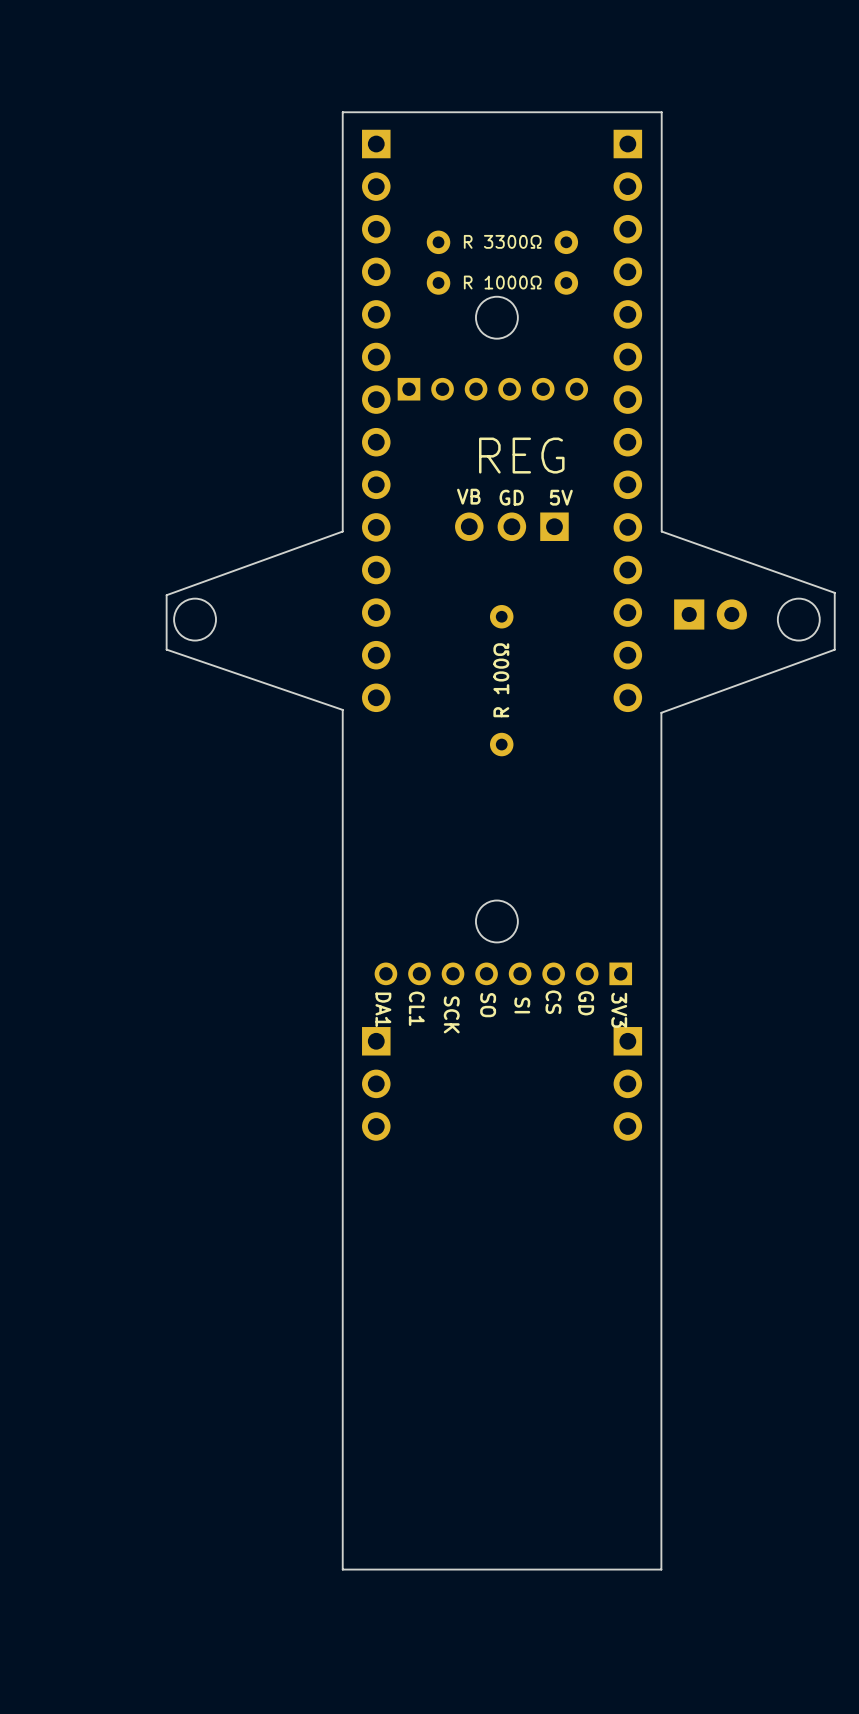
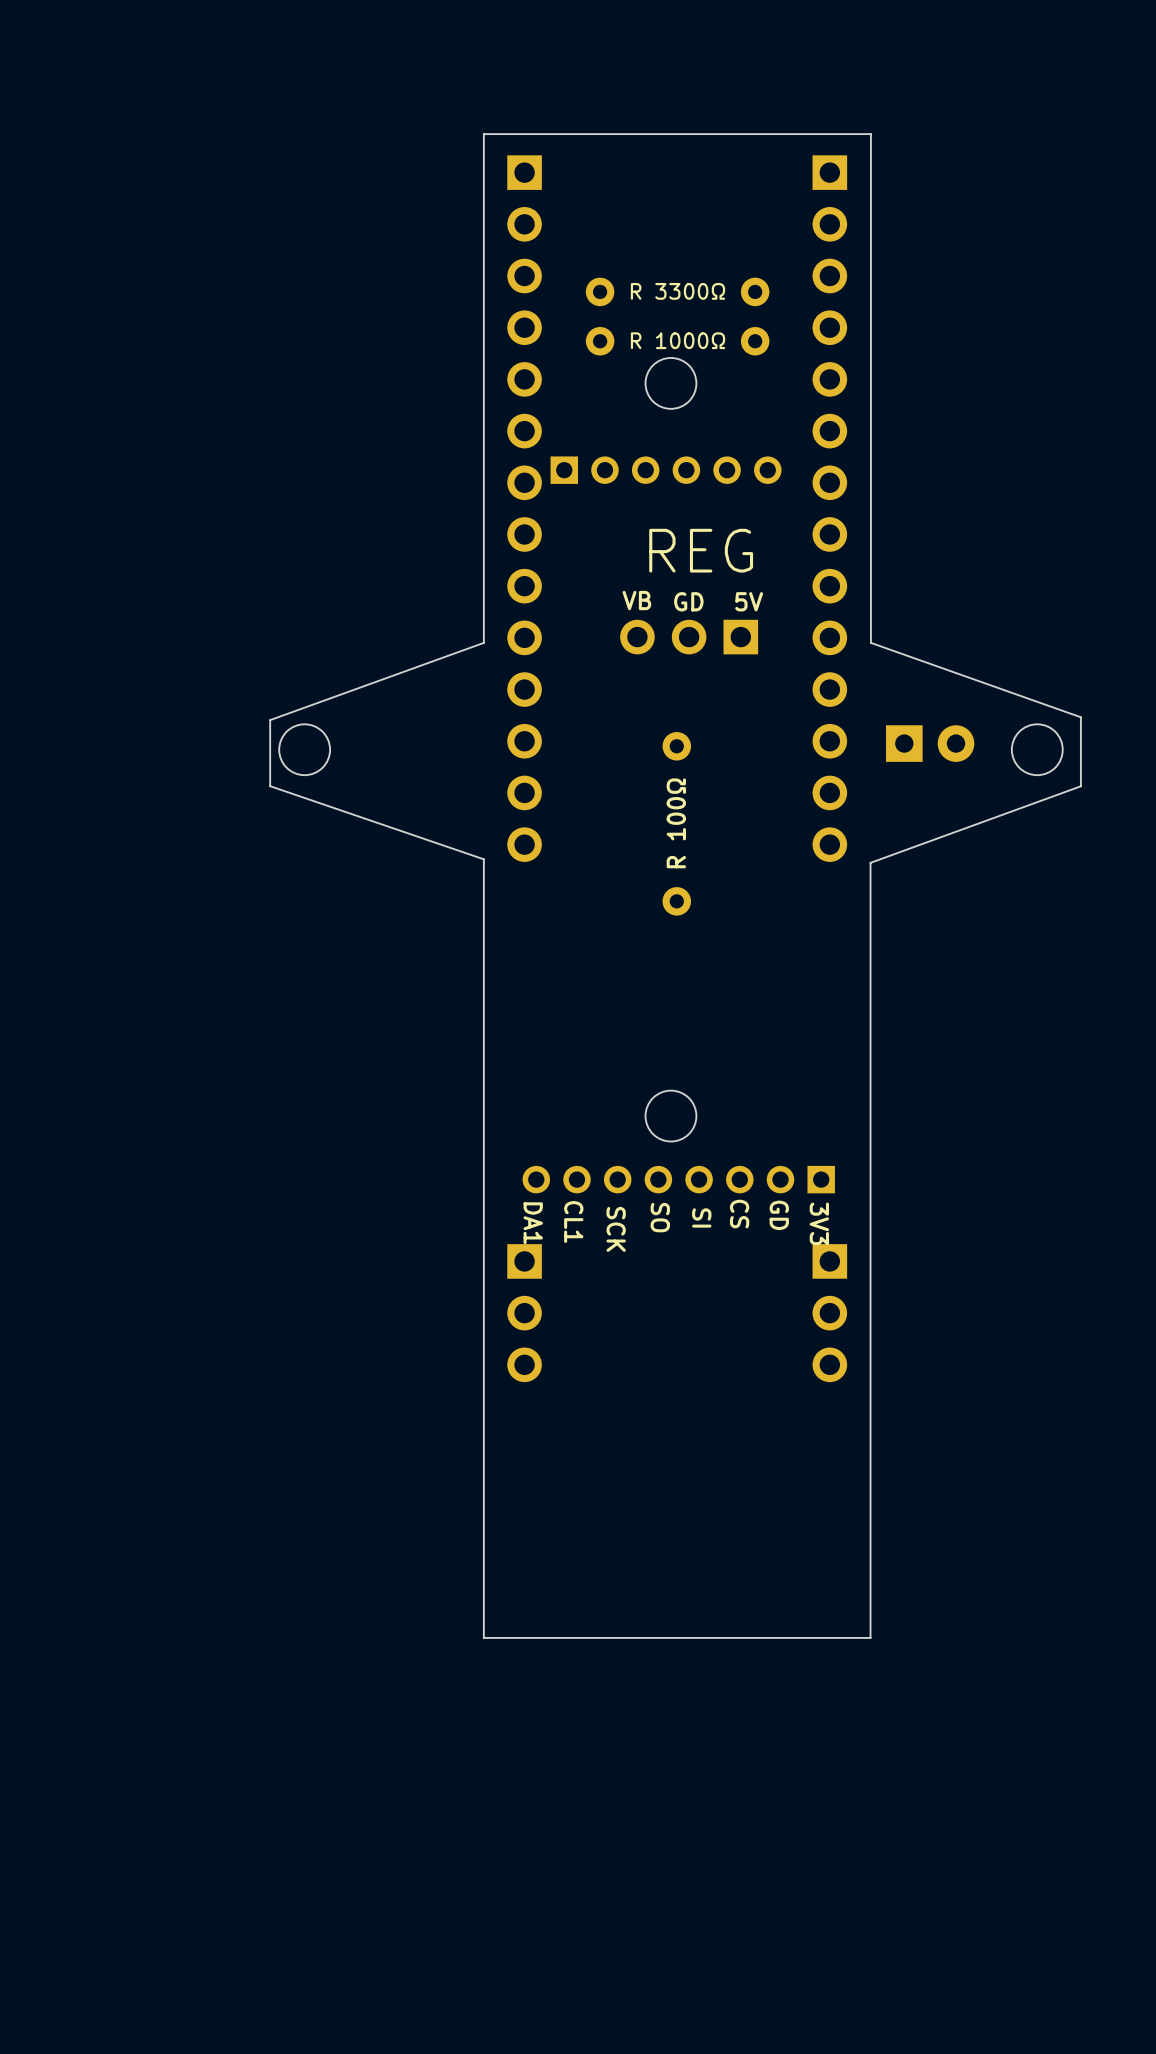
board edge: (661, 1351) (661, 1569) (342, 1569) (342, 1351) -> (870, 1637) (483, 1637)

